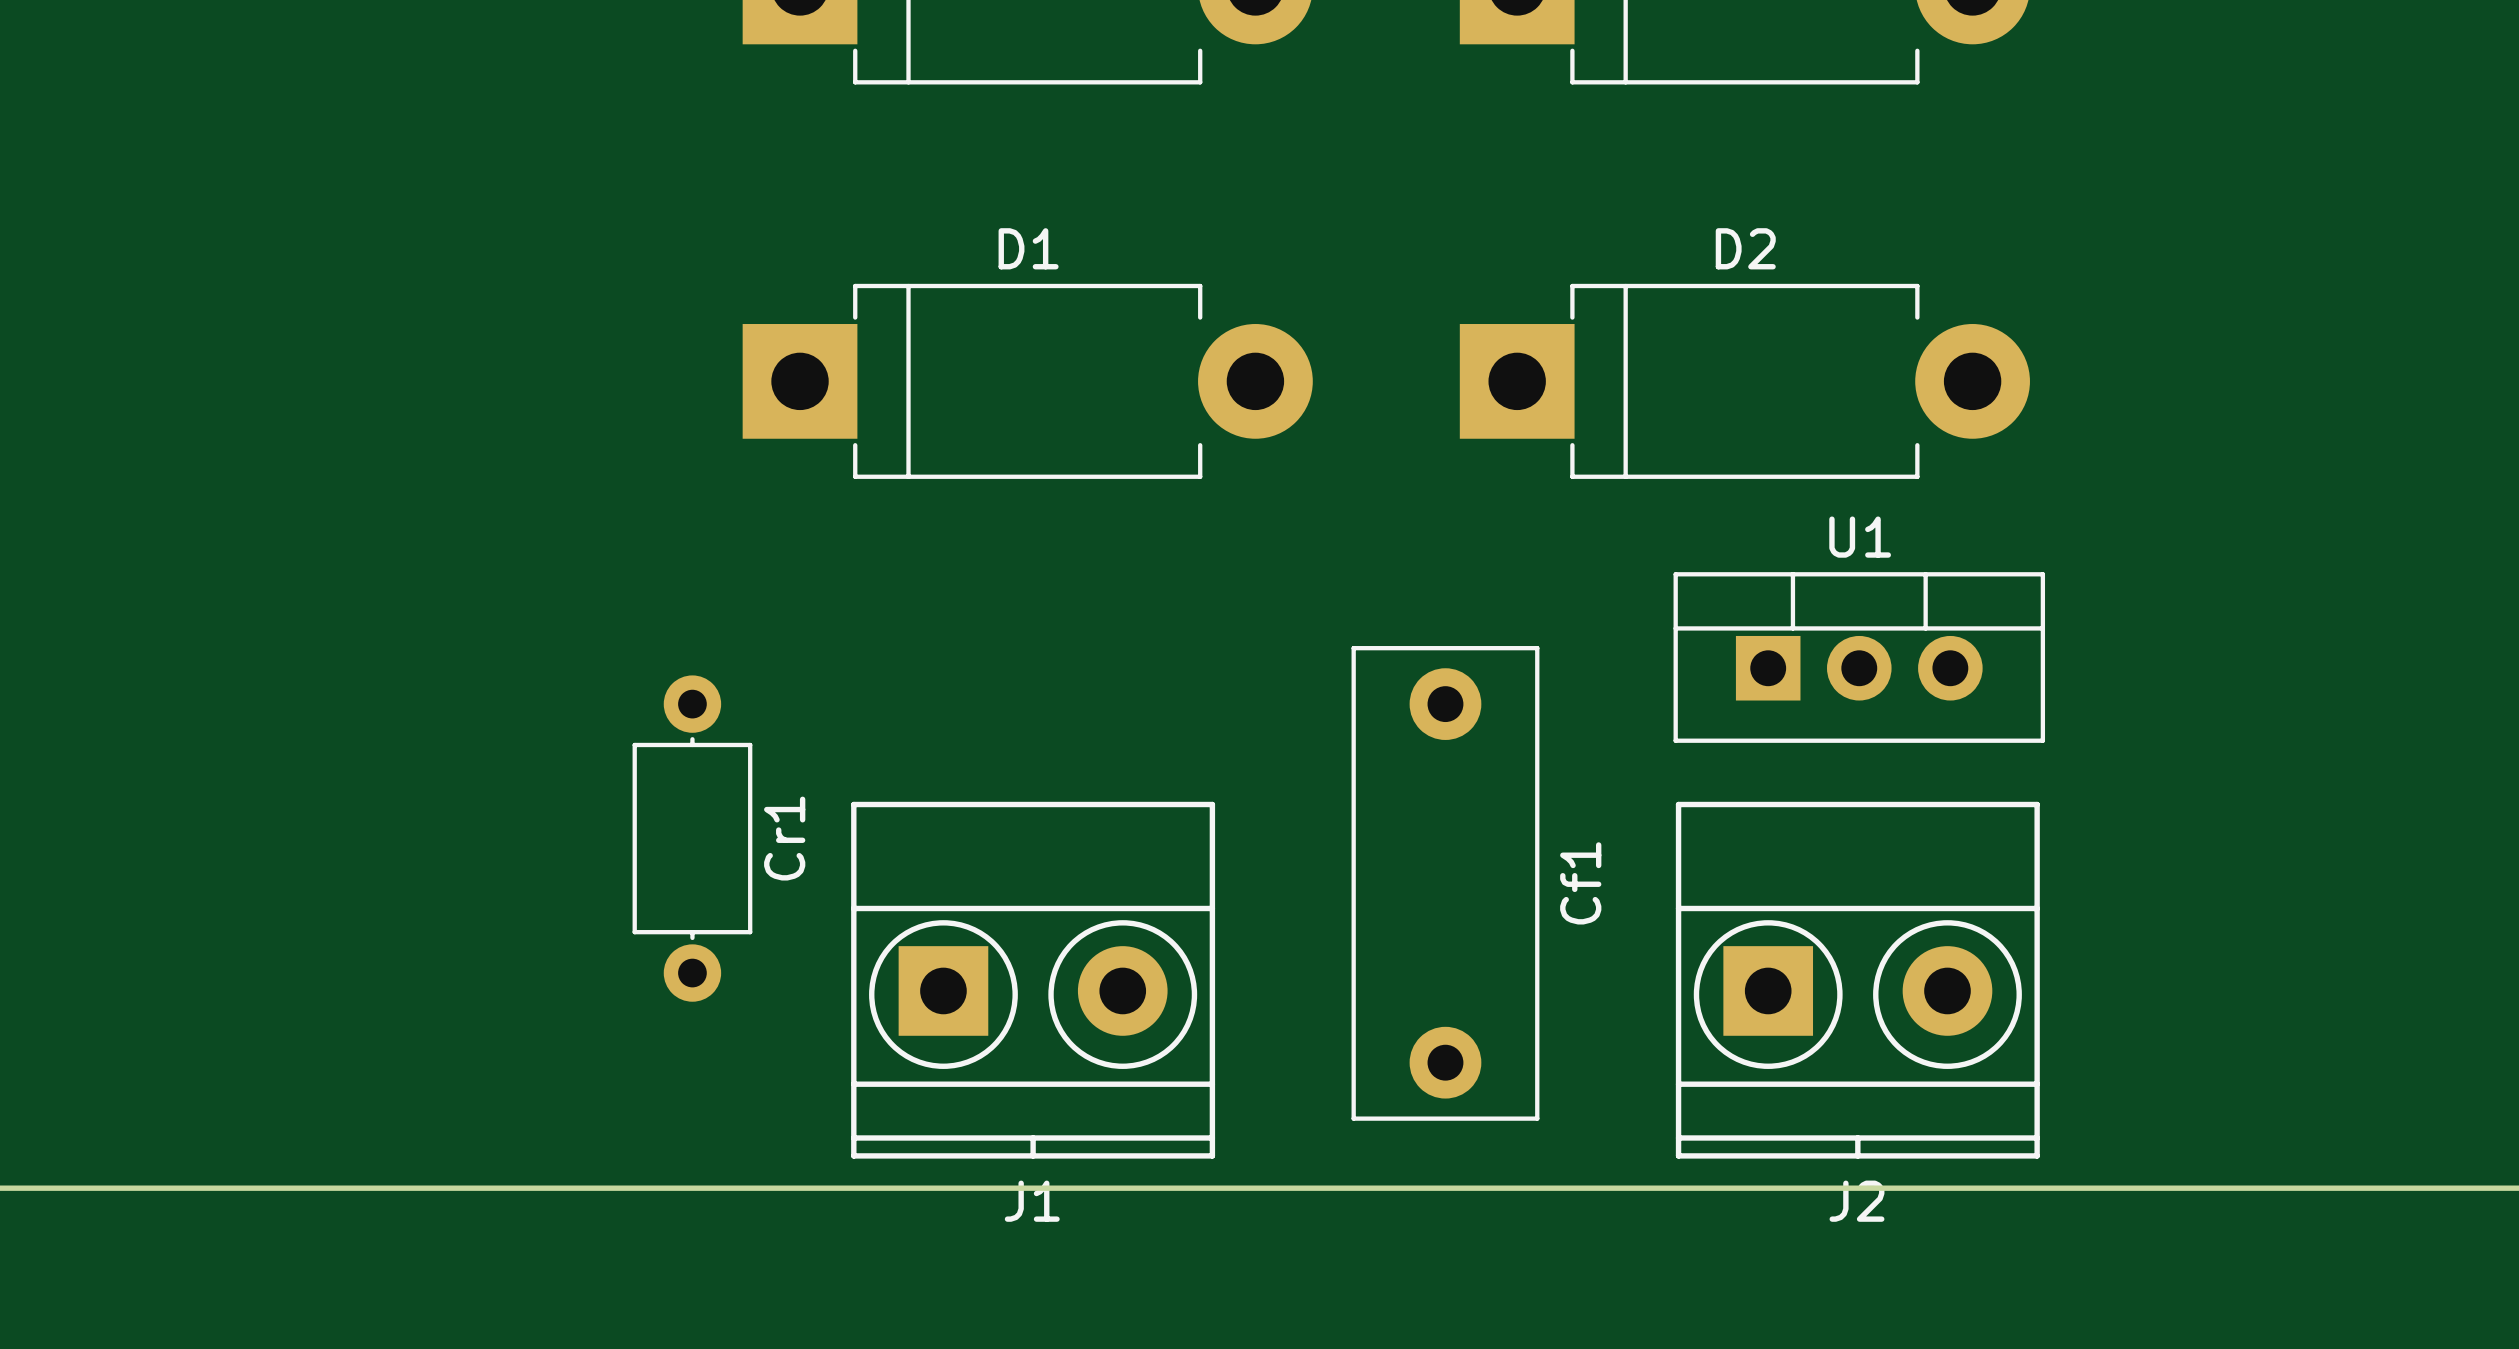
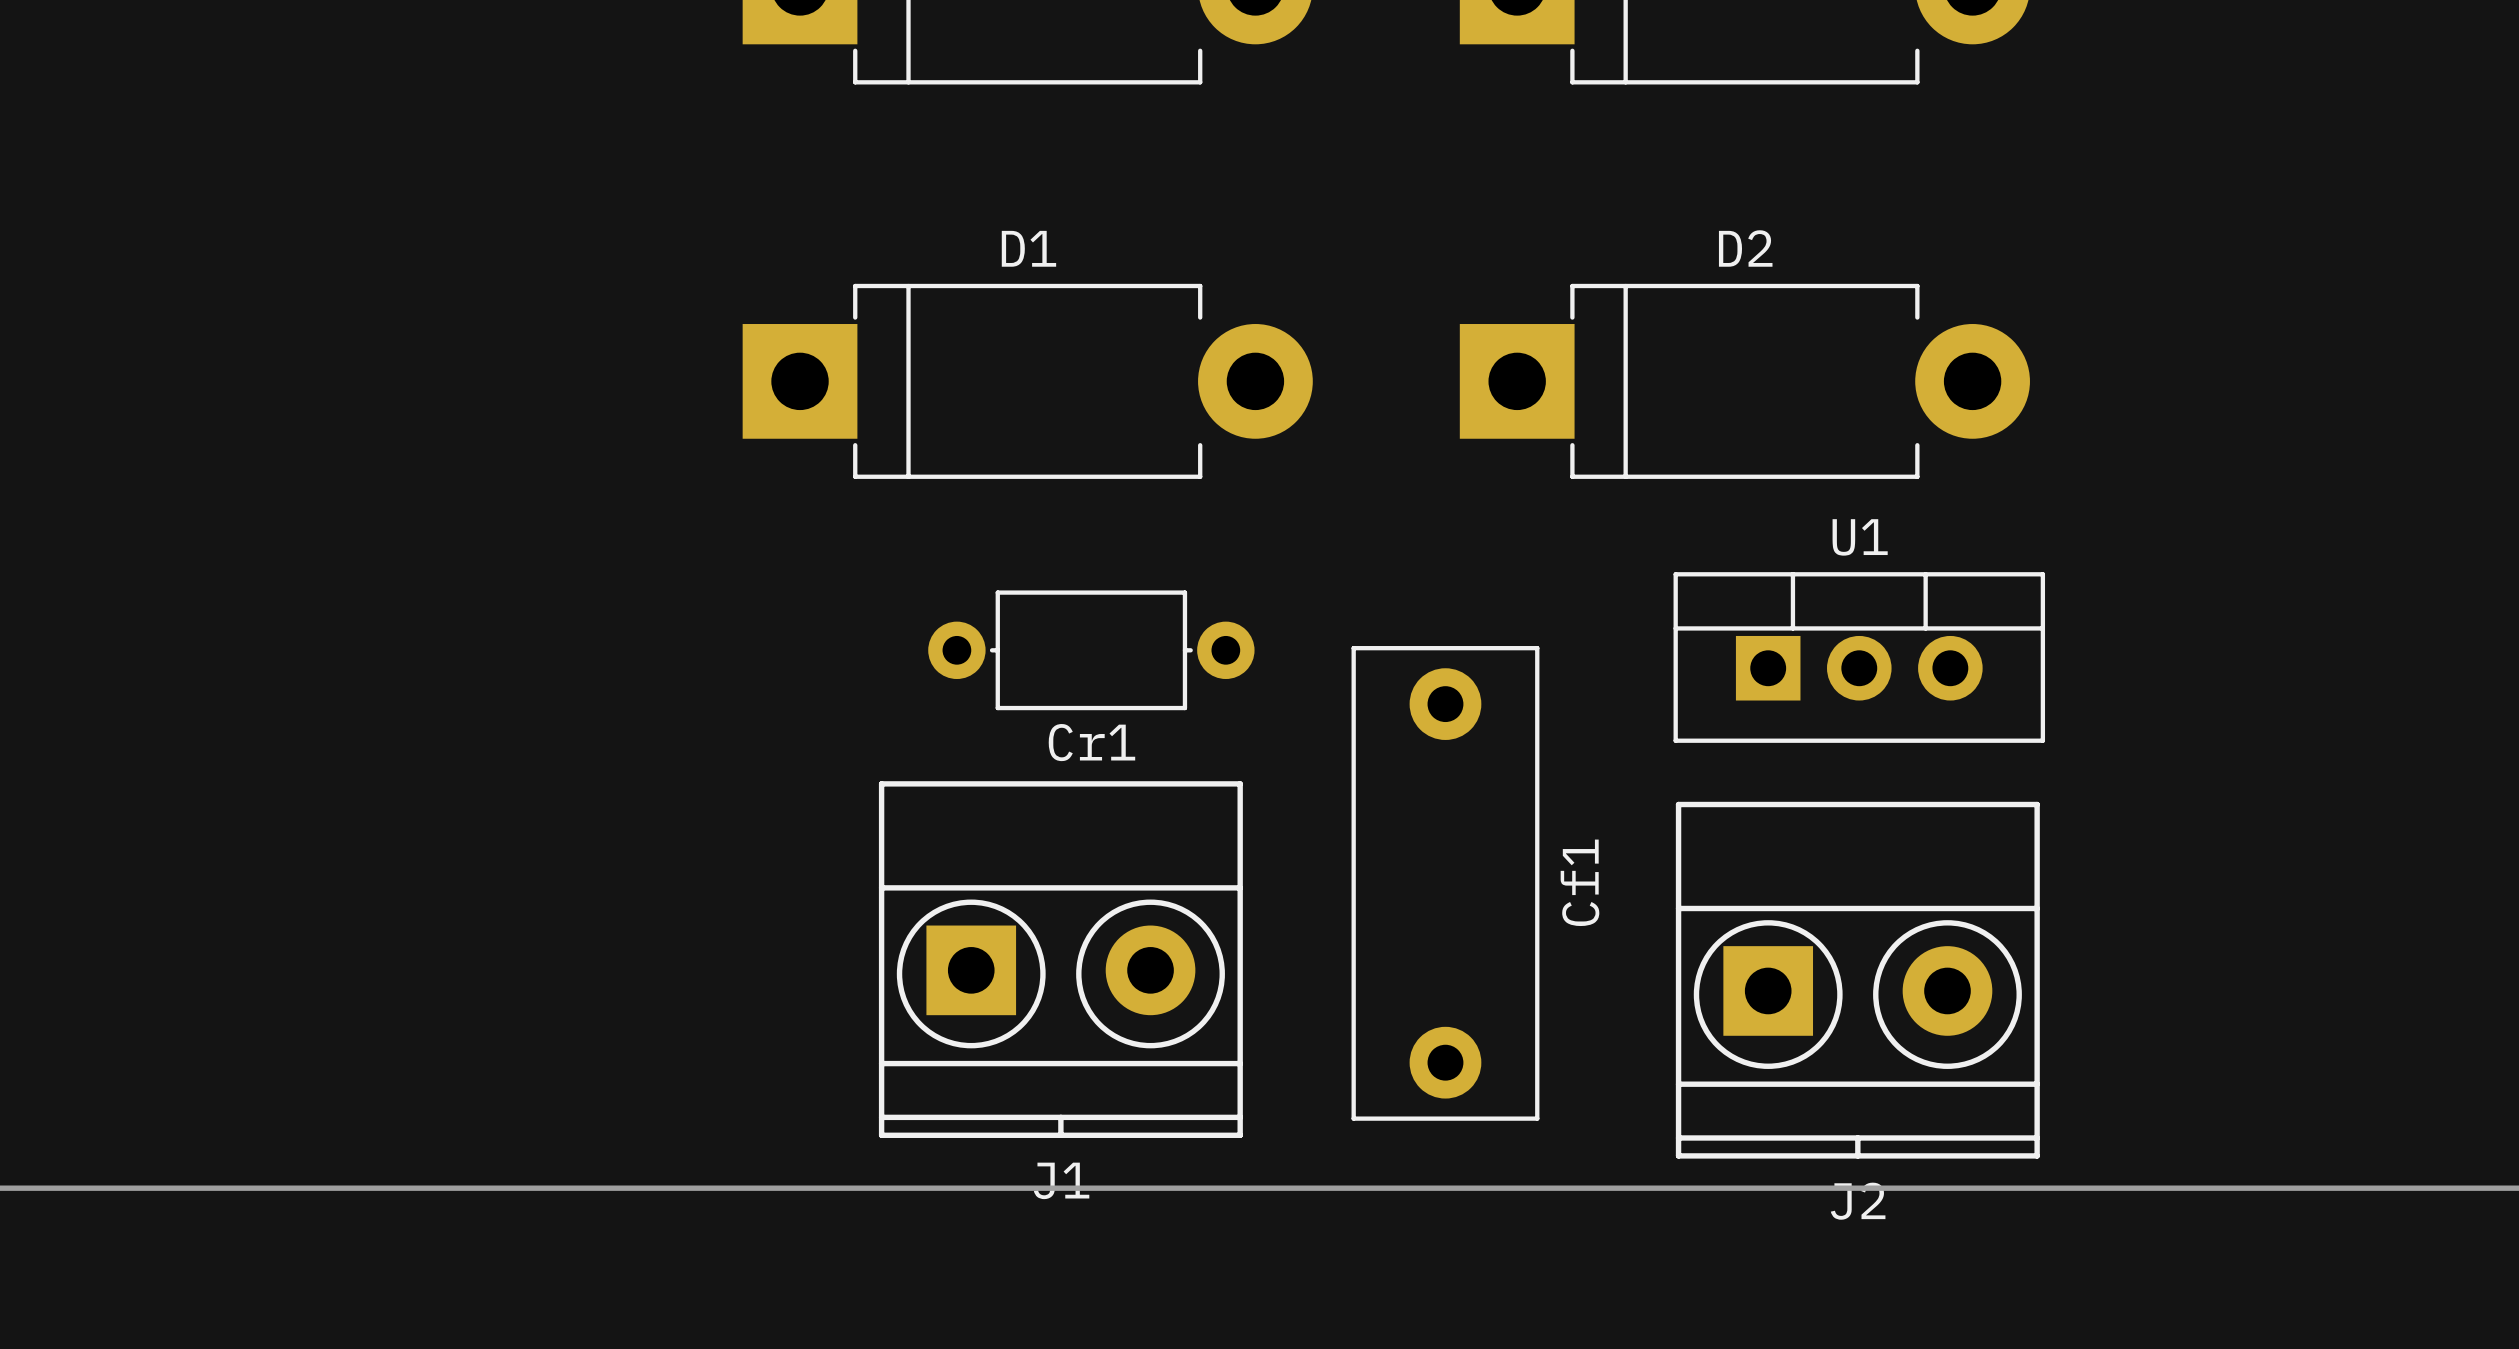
Cr1 rotation: 0° (692, 838) -> 90° clockwise (1091, 650)
Cr1 position: (692, 838) -> (1091, 650)
J1 position: (1033, 980) -> (1060, 959)

